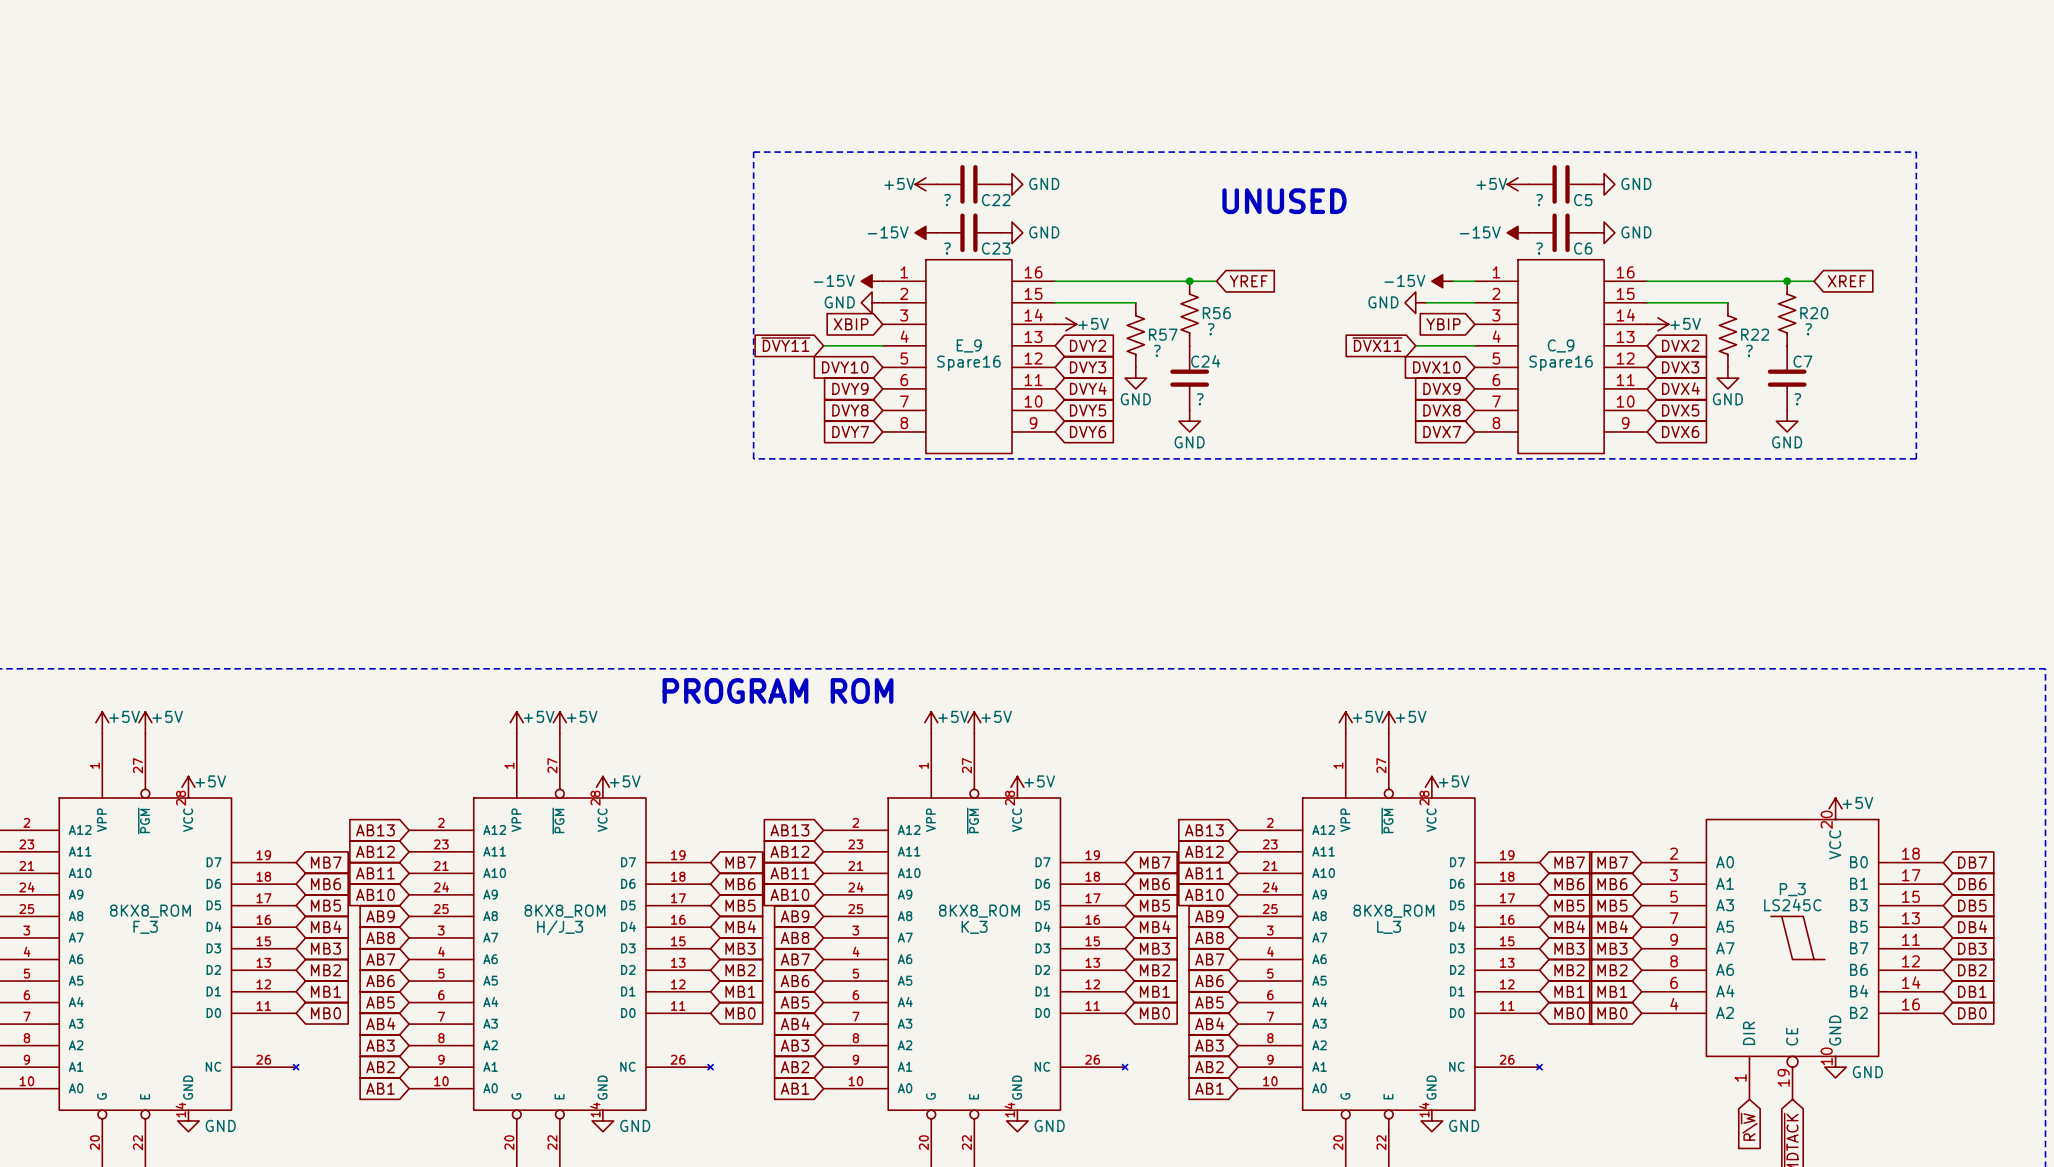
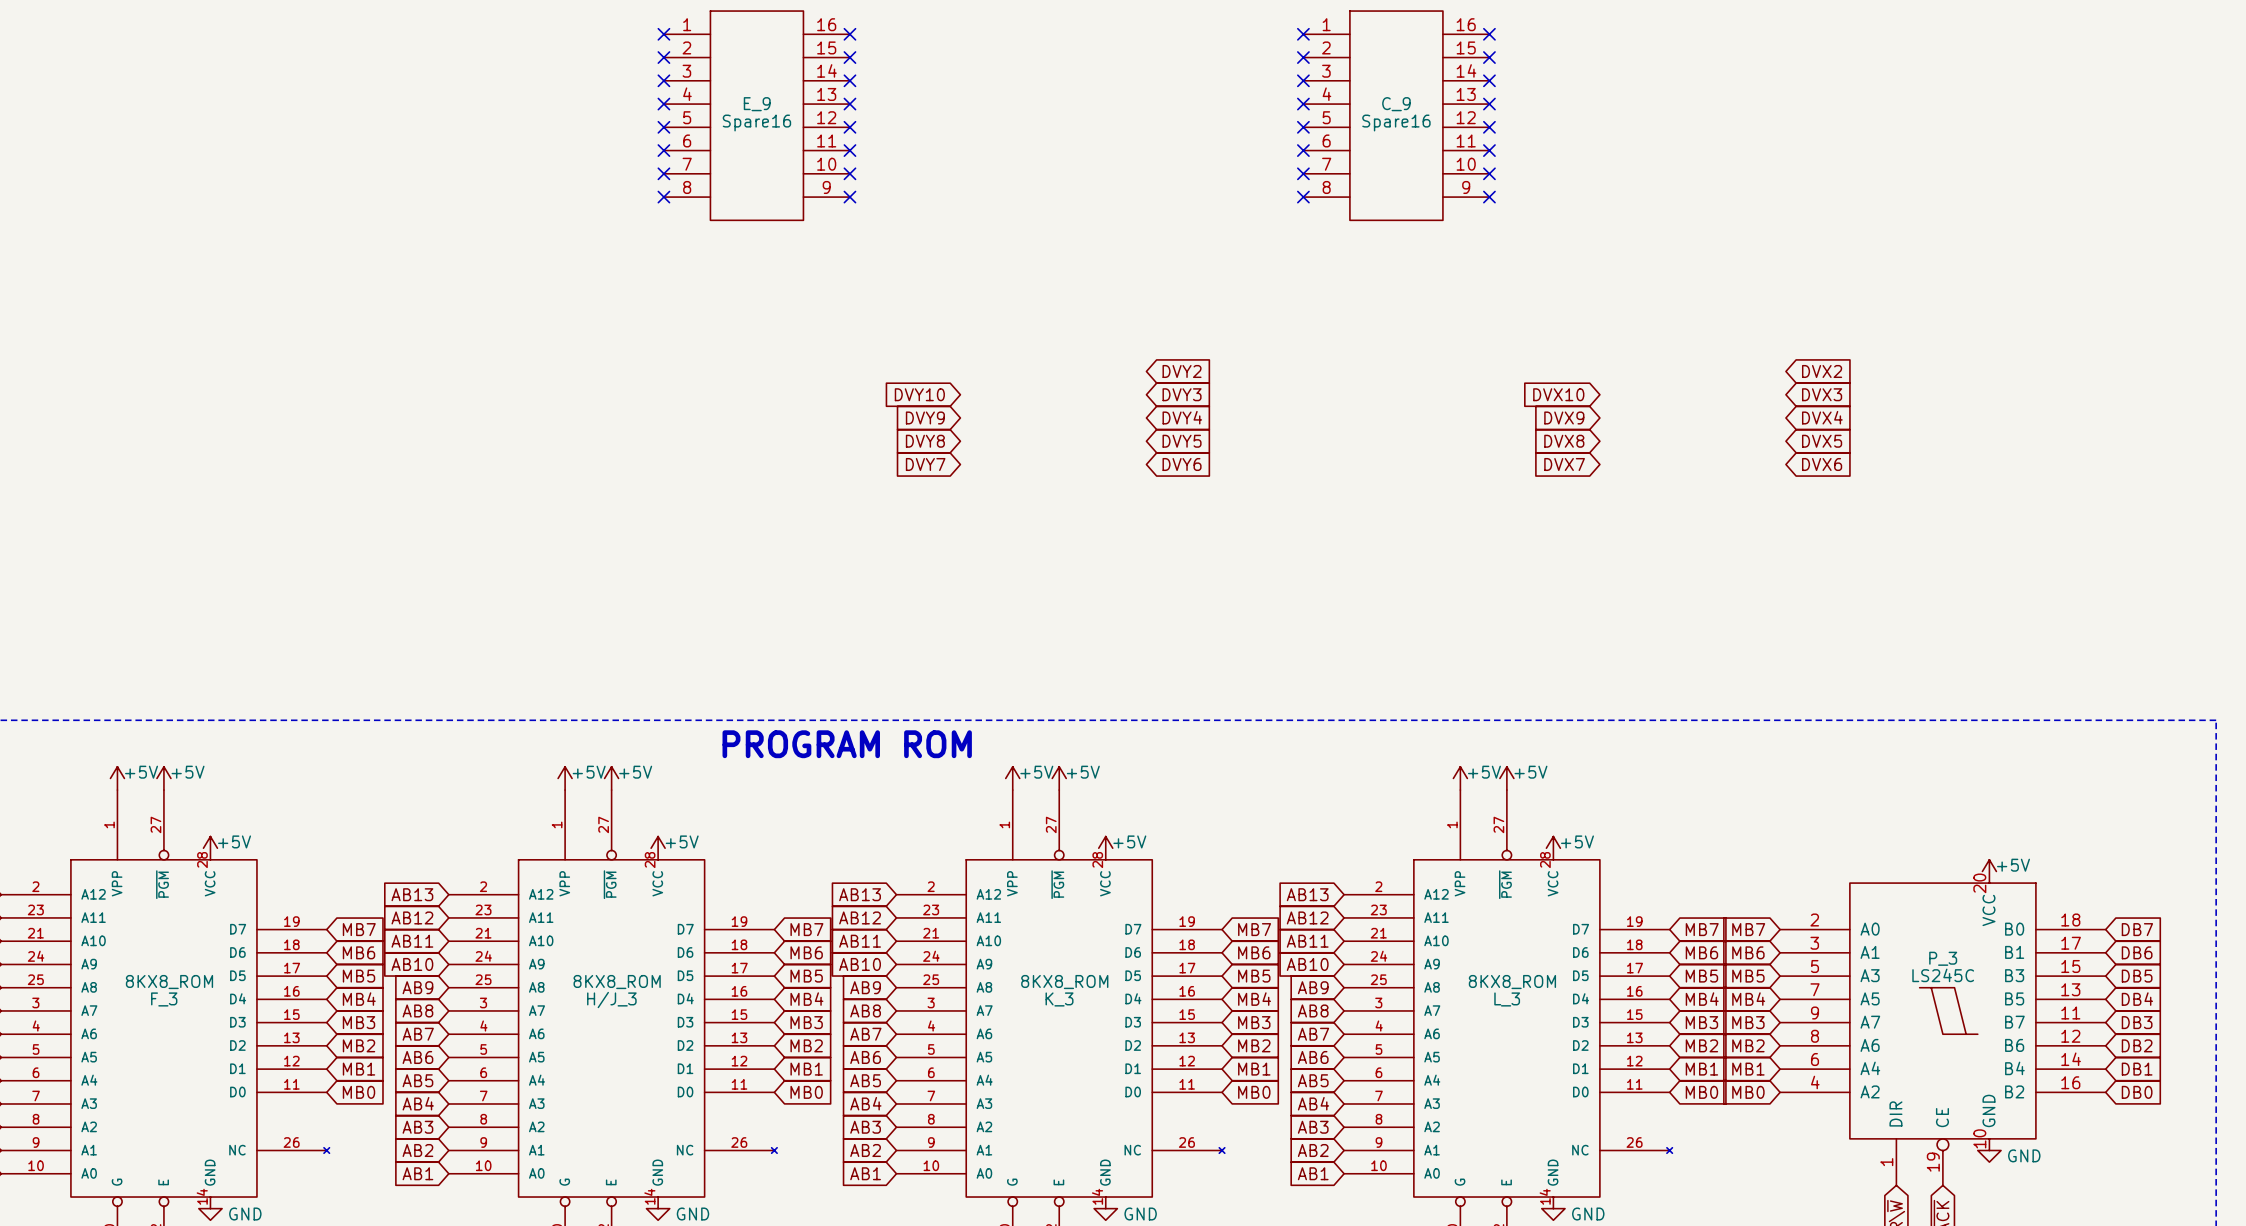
no-connect mark: none -> (663, 34)
no-connect mark: none -> (849, 34)
no-connect mark: none -> (1303, 34)
no-connect mark: none -> (1489, 34)
no-connect mark: none -> (663, 57)
no-connect mark: none -> (849, 57)
no-connect mark: none -> (1303, 57)
no-connect mark: none -> (1489, 57)
no-connect mark: none -> (663, 80)
no-connect mark: none -> (849, 80)
no-connect mark: none -> (1303, 80)
no-connect mark: none -> (1489, 80)
no-connect mark: none -> (663, 104)
no-connect mark: none -> (849, 104)
no-connect mark: none -> (1303, 104)
no-connect mark: none -> (1489, 104)
no-connect mark: none -> (663, 127)
no-connect mark: none -> (849, 127)
no-connect mark: none -> (1303, 127)
no-connect mark: none -> (1489, 127)
no-connect mark: none -> (663, 150)
no-connect mark: none -> (849, 150)
no-connect mark: none -> (1303, 150)
no-connect mark: none -> (1489, 150)
line: (753, 152) (1916, 152) (1916, 458) (753, 458) (753, 152) -> none
no-connect mark: none -> (663, 173)
no-connect mark: none -> (849, 173)
no-connect mark: none -> (1303, 173)
no-connect mark: none -> (1489, 173)
no-connect mark: none -> (663, 197)
no-connect mark: none -> (849, 197)
power symbol: +5V (925, 184) -> none
C22: ? (968, 184) -> none
power symbol: GND (1012, 184) -> none
no-connect mark: none -> (1303, 197)
no-connect mark: none -> (1489, 197)
power symbol: +5V (1517, 184) -> none
C5: ? (1561, 184) -> none
power symbol: GND (1604, 184) -> none
text: UNUSED (1284, 201) -> none
power symbol: -15V (925, 232) -> none
C23: ? (968, 232) -> none
power symbol: GND (1012, 232) -> none
power symbol: -15V (1517, 232) -> none
C6: ? (1561, 232) -> none
power symbol: GND (1604, 232) -> none
power symbol: -15V (872, 281) -> none
wire: (1055, 281) (1216, 281) -> none
junction: (1189, 281) -> none
global label: YREF (1248, 281) -> none
power symbol: -15V (1442, 281) -> none
wire: (1453, 281) (1474, 281) -> none
wire: (1647, 281) (1814, 281) -> none
junction: (1787, 281) -> none
global label: XREF (1847, 281) -> none
power symbol: GND (872, 302) -> none
wire: (1055, 302) (1135, 302) -> none
power symbol: GND (1415, 302) -> none
wire: (1426, 302) (1474, 302) -> none
wire: (1647, 302) (1727, 302) -> none
R56: ? (1189, 313) -> none
R20: ? (1787, 313) -> none
global label: XBIP (851, 324) -> none
power symbol: +5V (1065, 324) -> none
global label: YBIP (1443, 324) -> none
power symbol: +5V (1657, 324) -> none
R57: ? (1135, 335) -> none
R22: ? (1727, 335) -> none
global label: ~{DVY11} (785, 344) -> none
global label: ~{DVX11} (1377, 344) -> none
wire: (823, 345) (882, 345) -> none
wire: (1415, 345) (1474, 345) -> none
E_9 position: (968, 356) -> (756, 115)
C_9 position: (1561, 356) -> (1396, 115)
power symbol: GND (1135, 378) -> none
C24: ? (1189, 378) -> none
power symbol: GND (1727, 378) -> none
C7: ? (1787, 378) -> none
power symbol: GND (1189, 421) -> none
power symbol: GND (1787, 421) -> none

